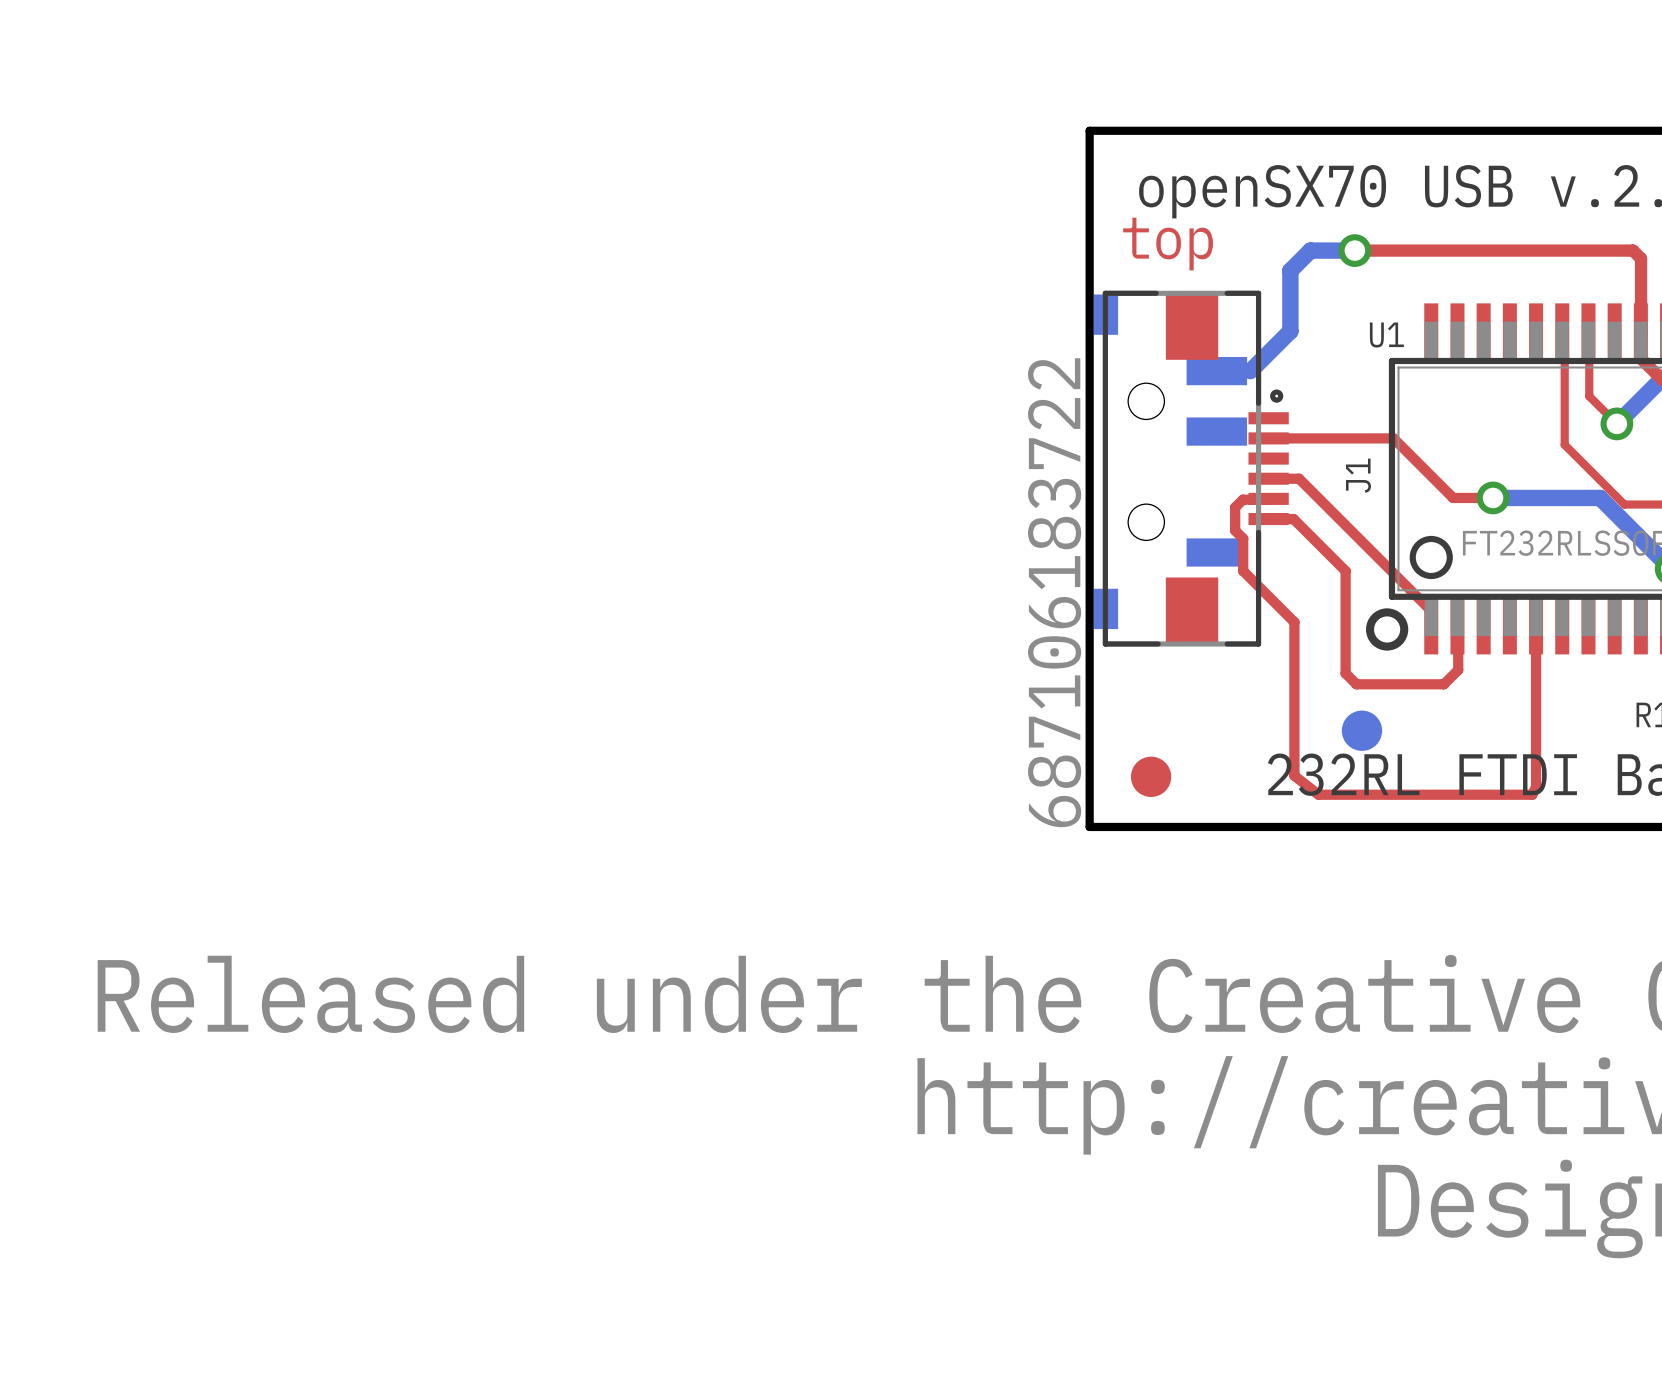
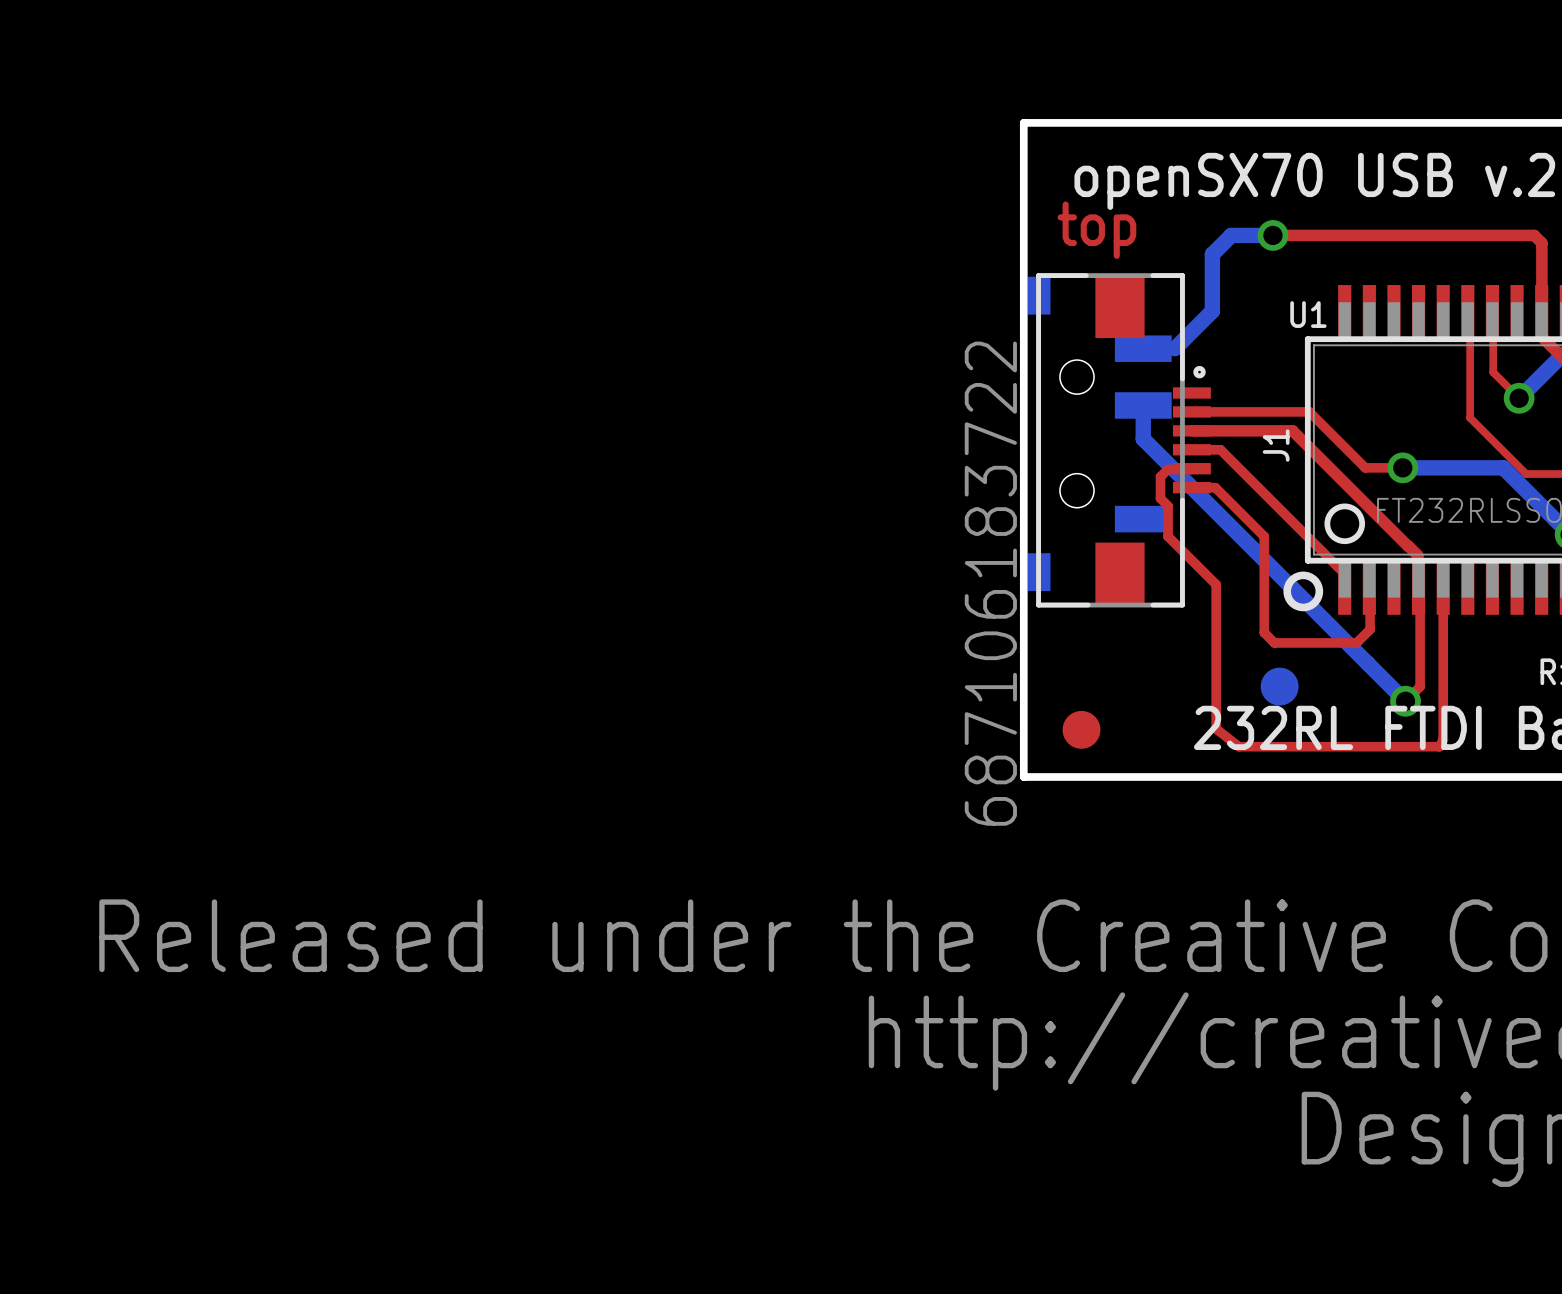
bottom track: none -> (1143, 405) (1143, 438) (1405, 701)
top track: none -> (1191, 430) (1292, 430) (1407, 546)
top track: none -> (1408, 546) (1418, 555)
top track: none -> (1420, 588) (1420, 686) (1405, 701)
via: none -> (1405, 701)

